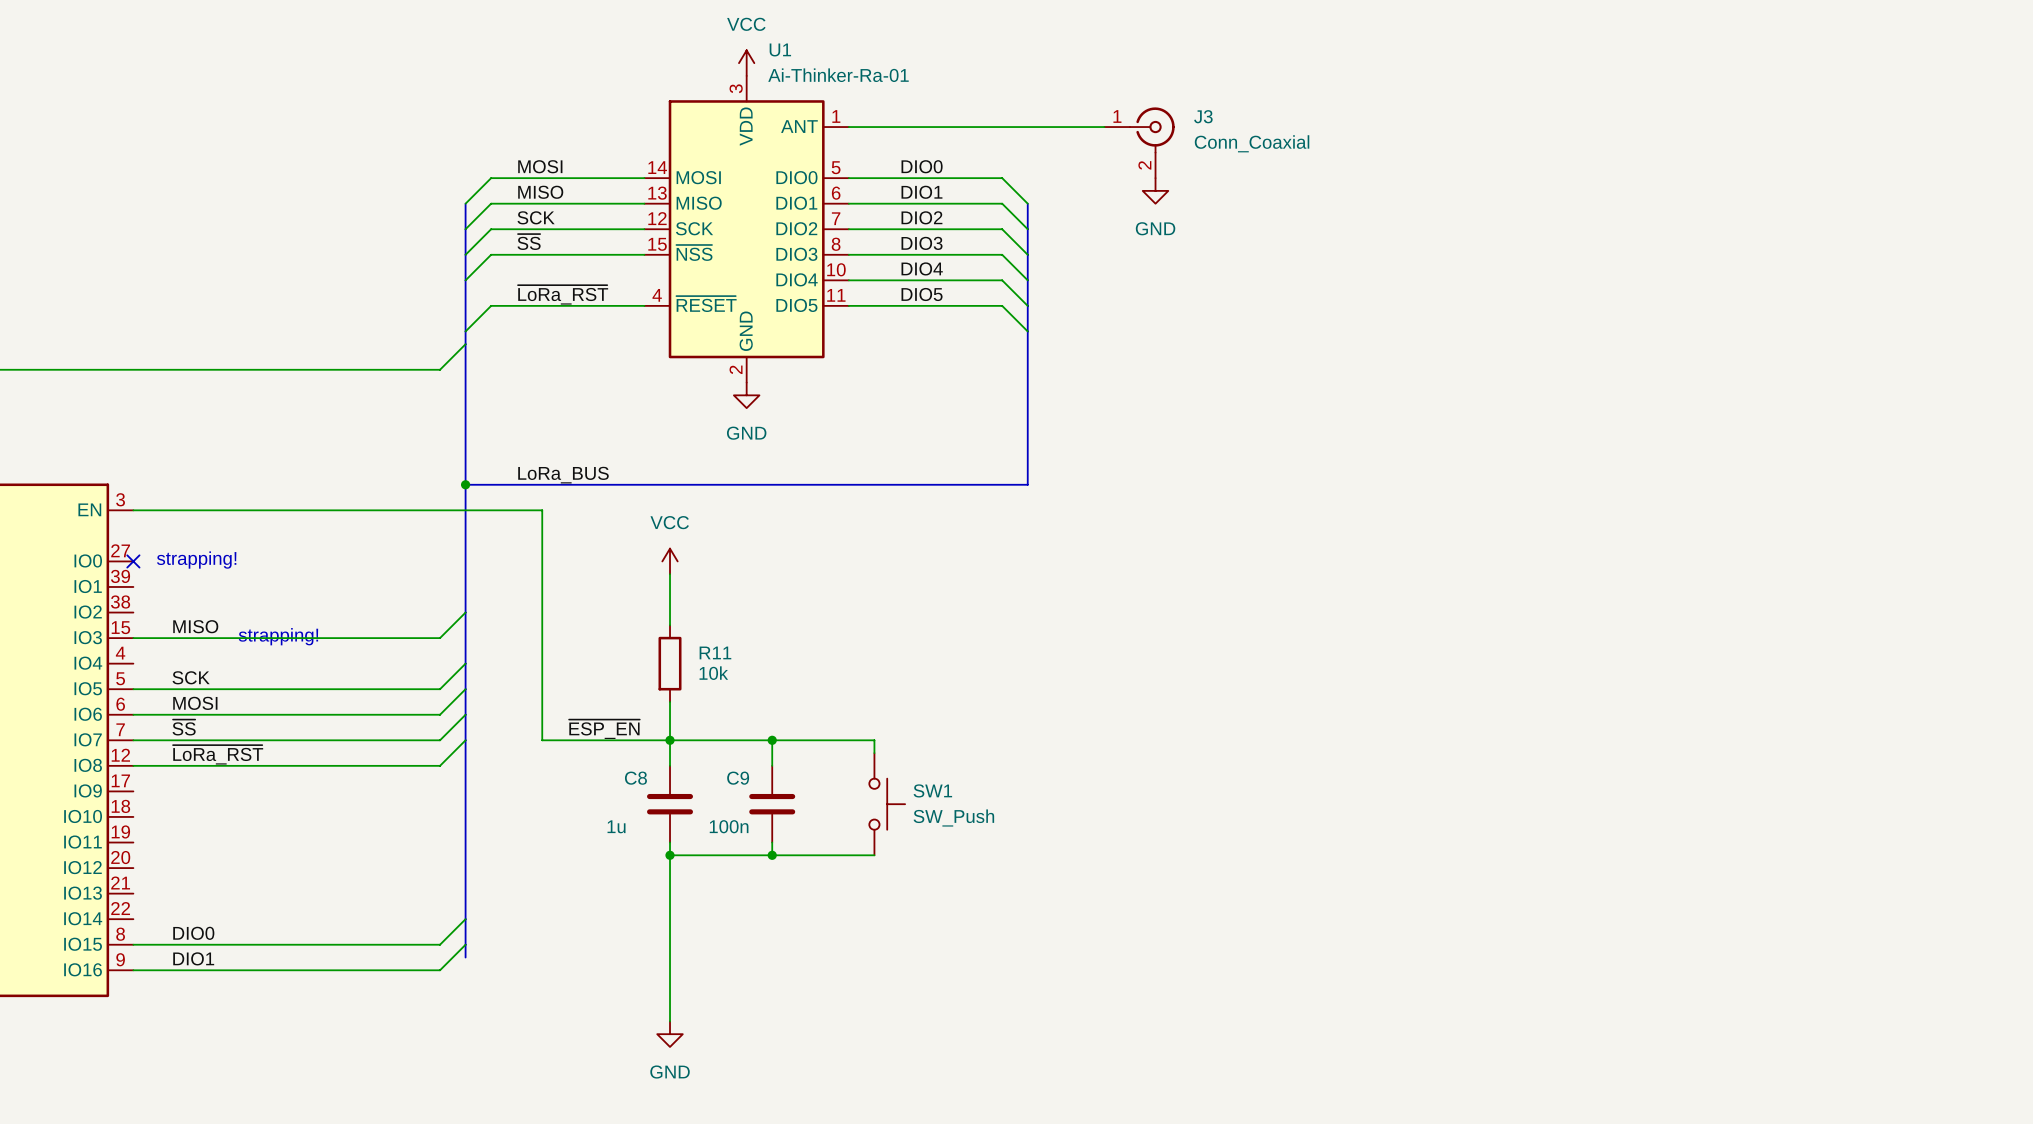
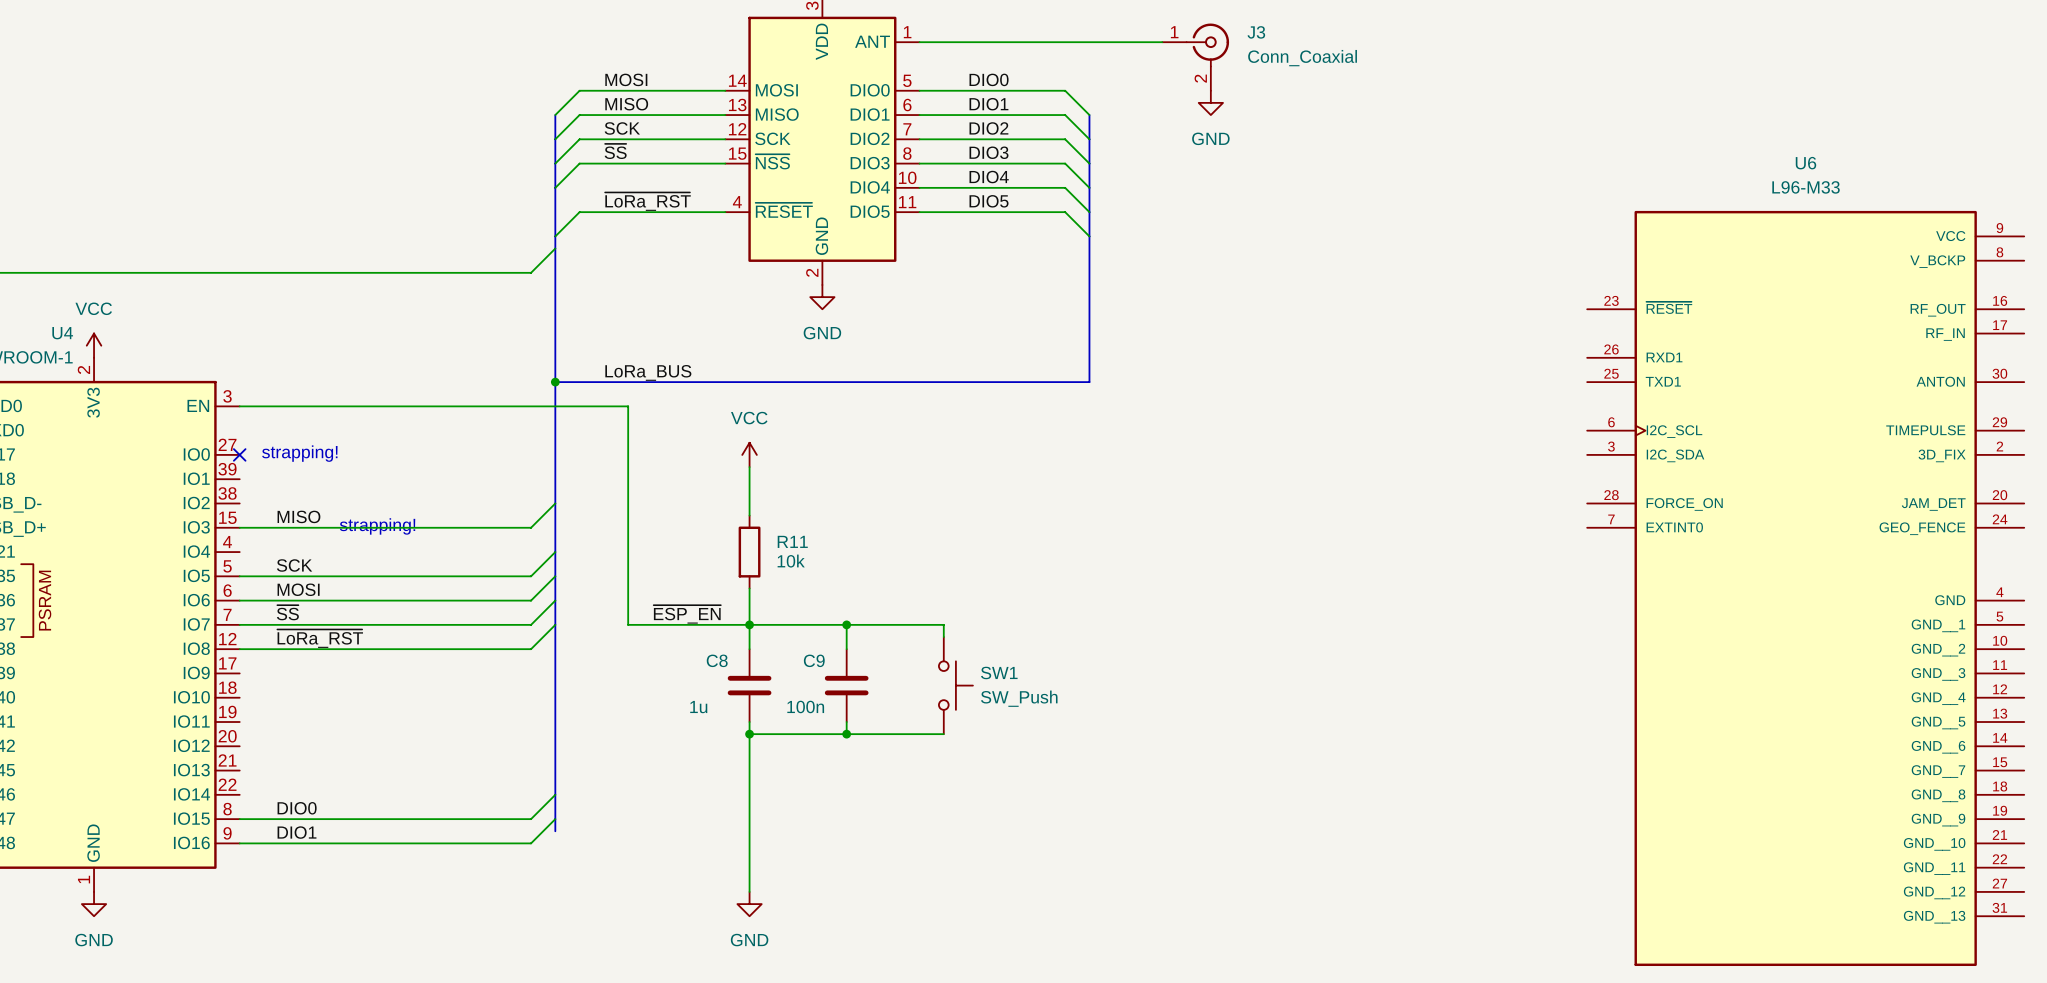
U6: none -> L96-M33 (1805, 588)

